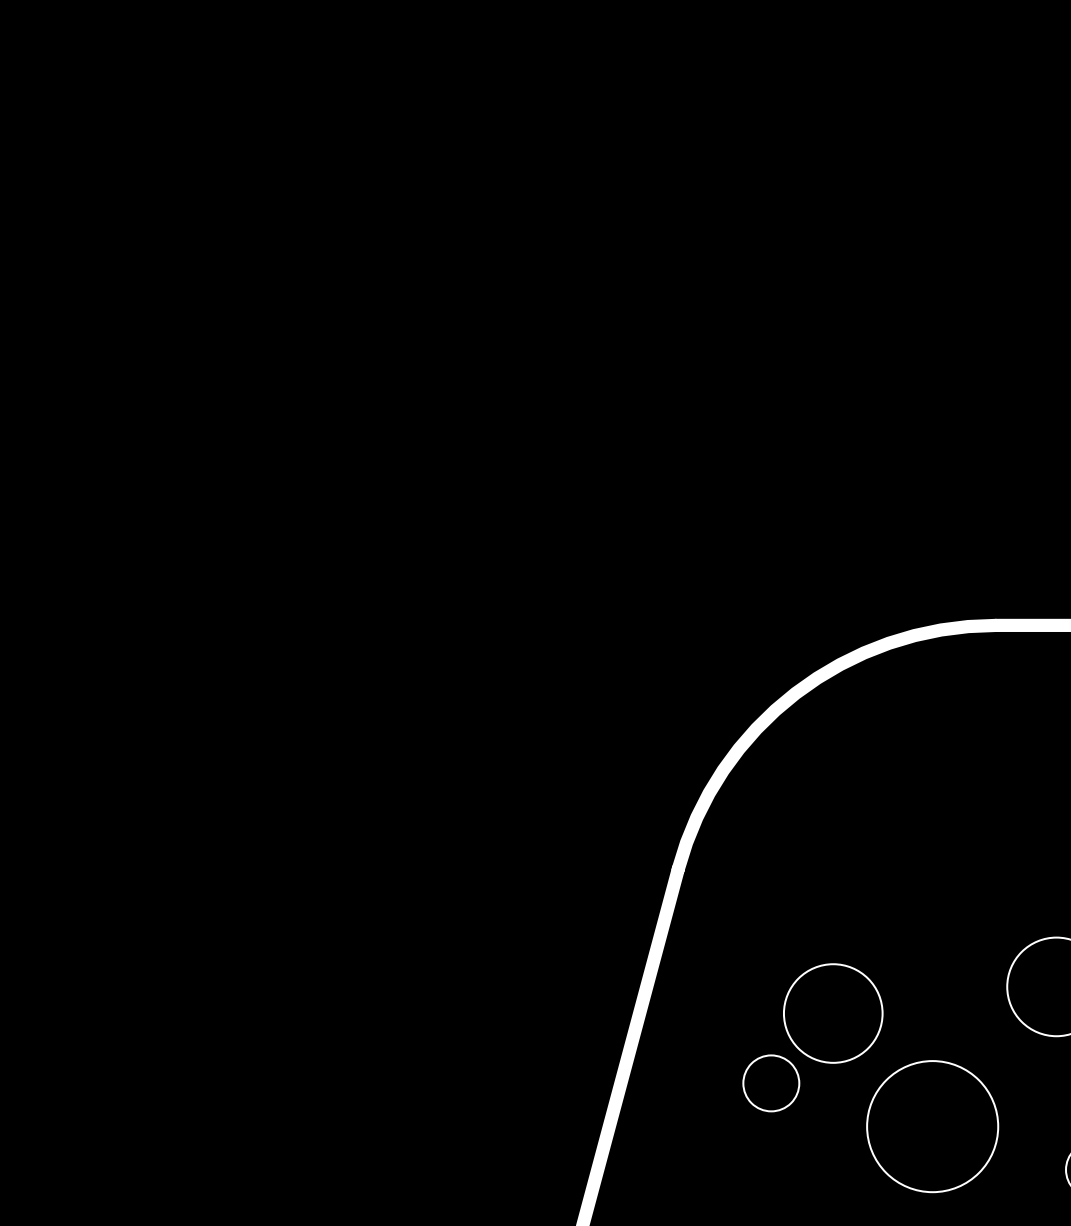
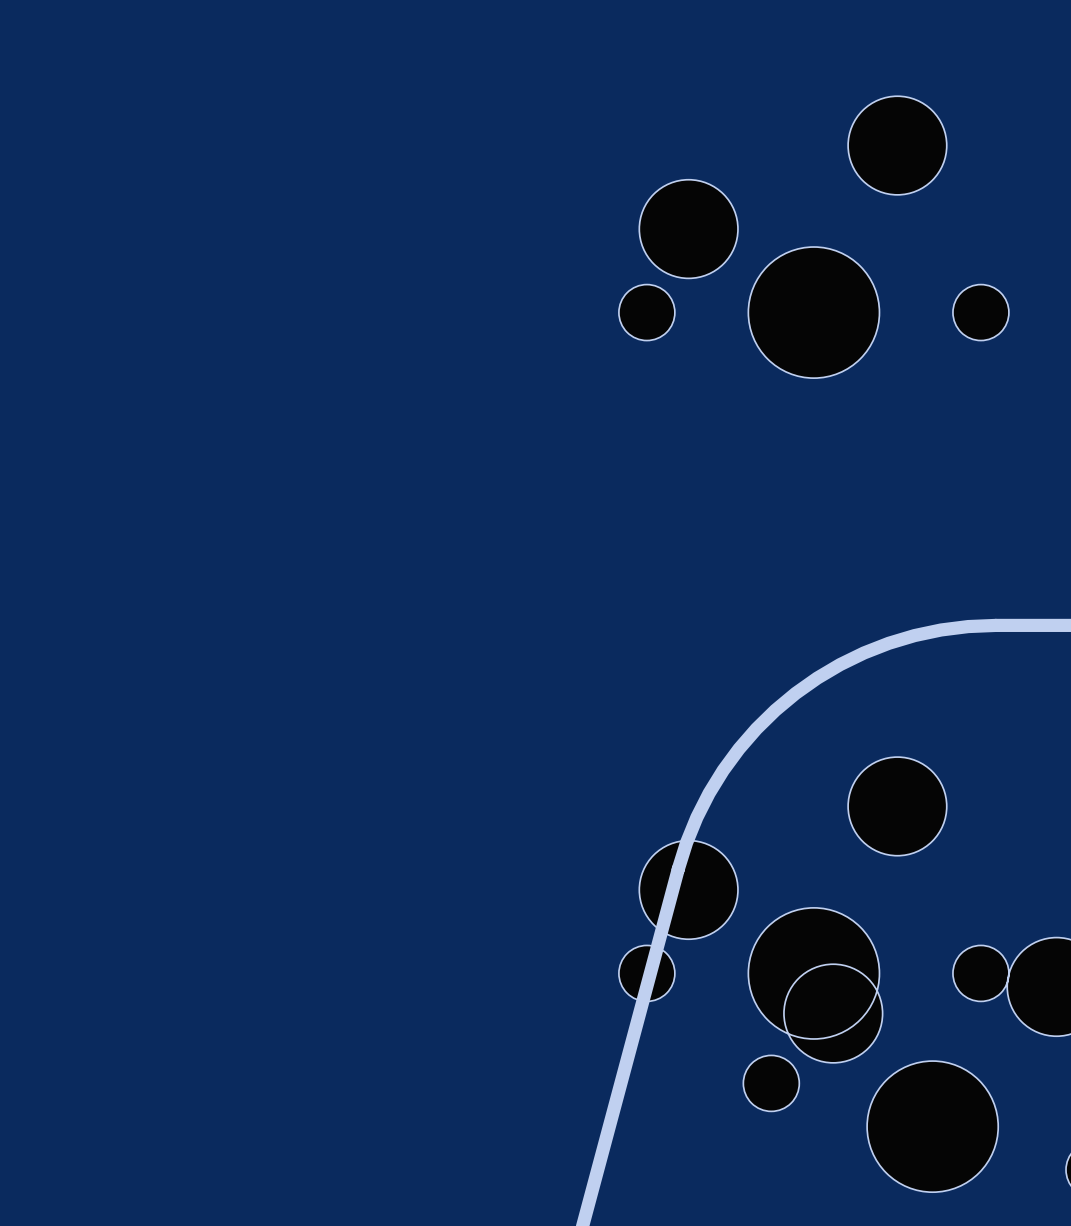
part: none -> (813, 237)
part: none -> (813, 898)

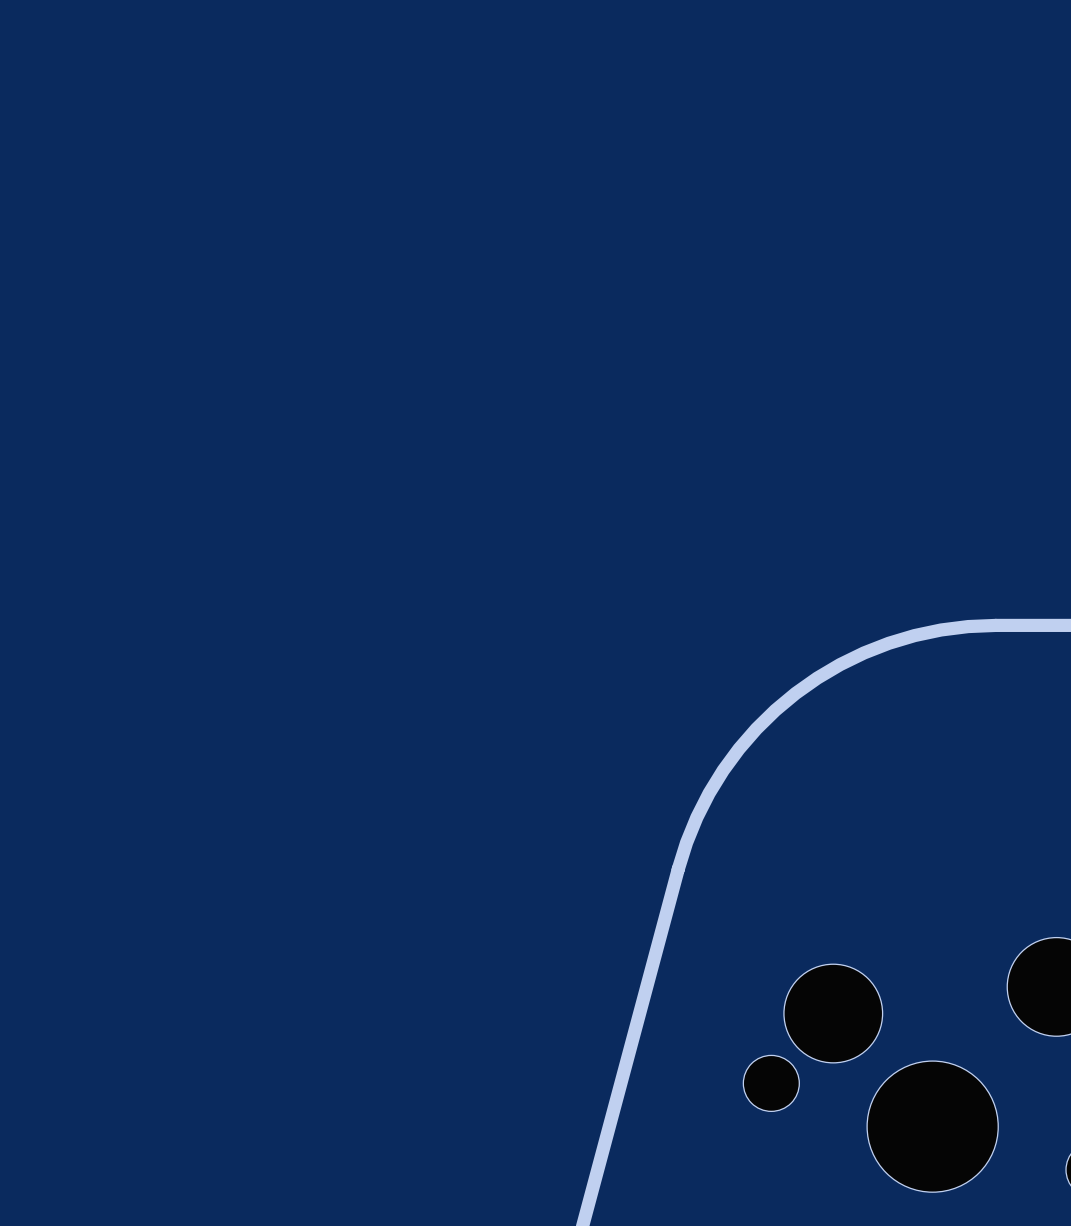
part: (813, 237) -> none
part: (813, 898) -> none

